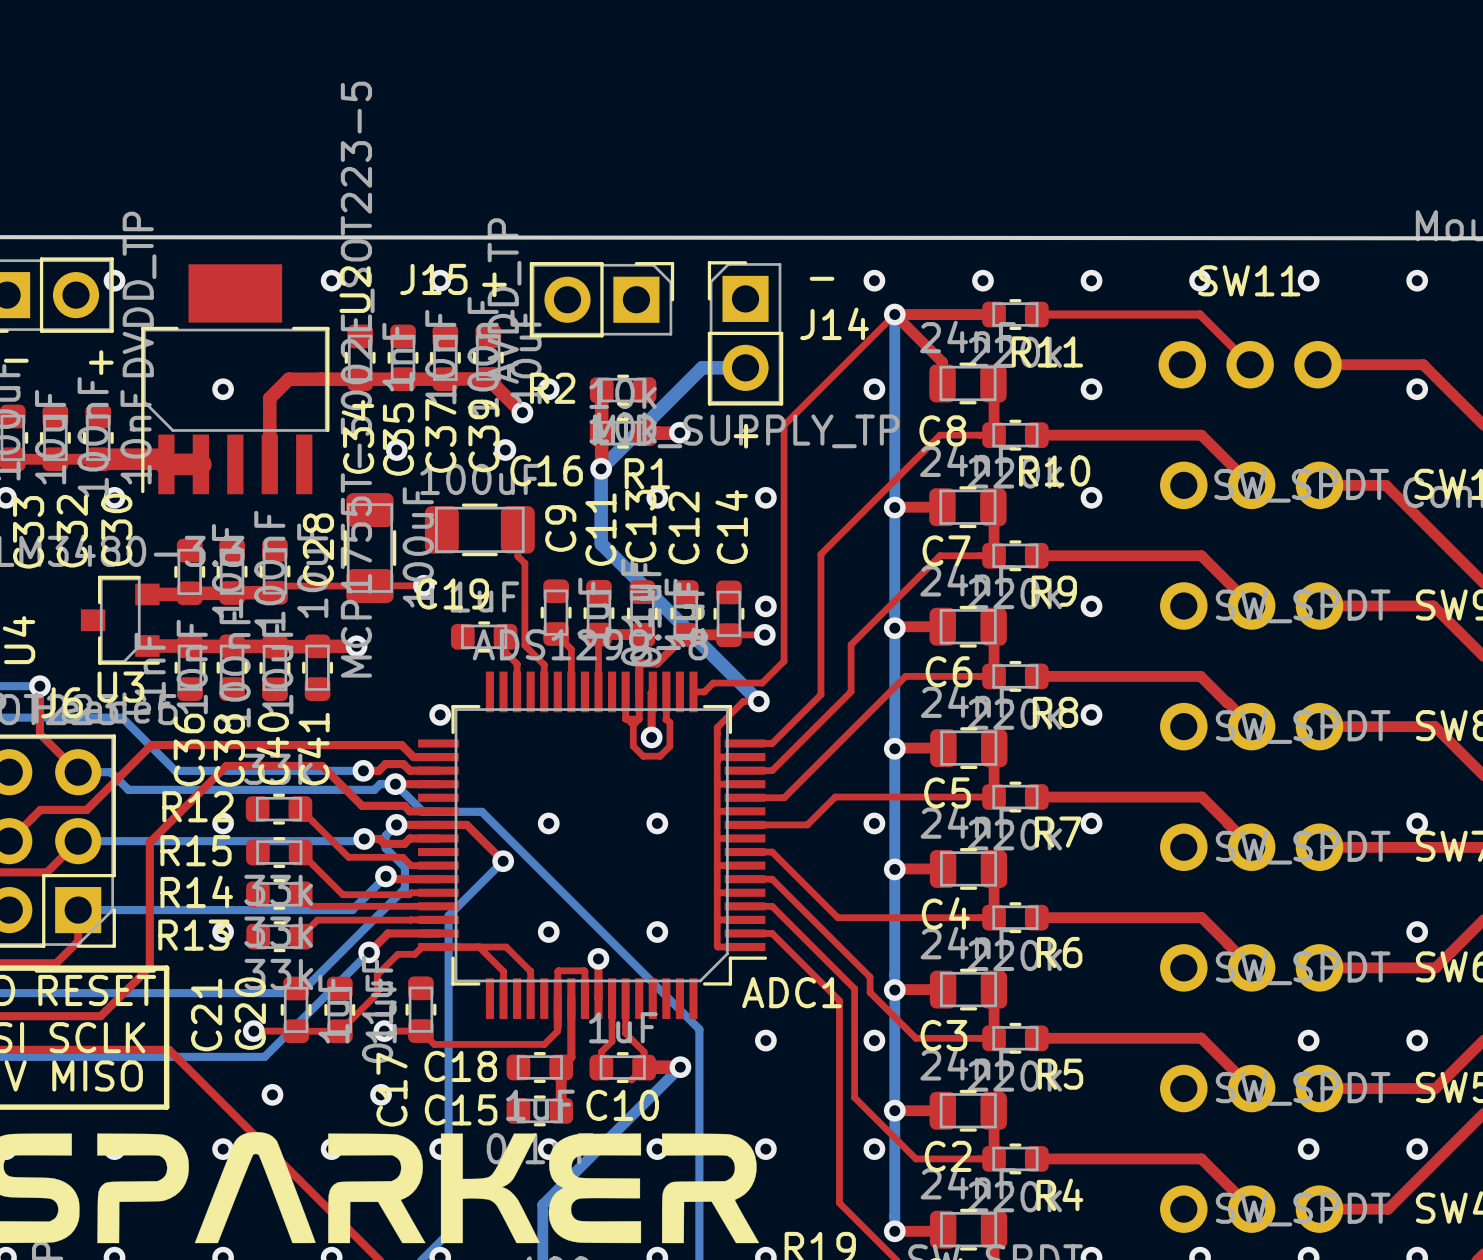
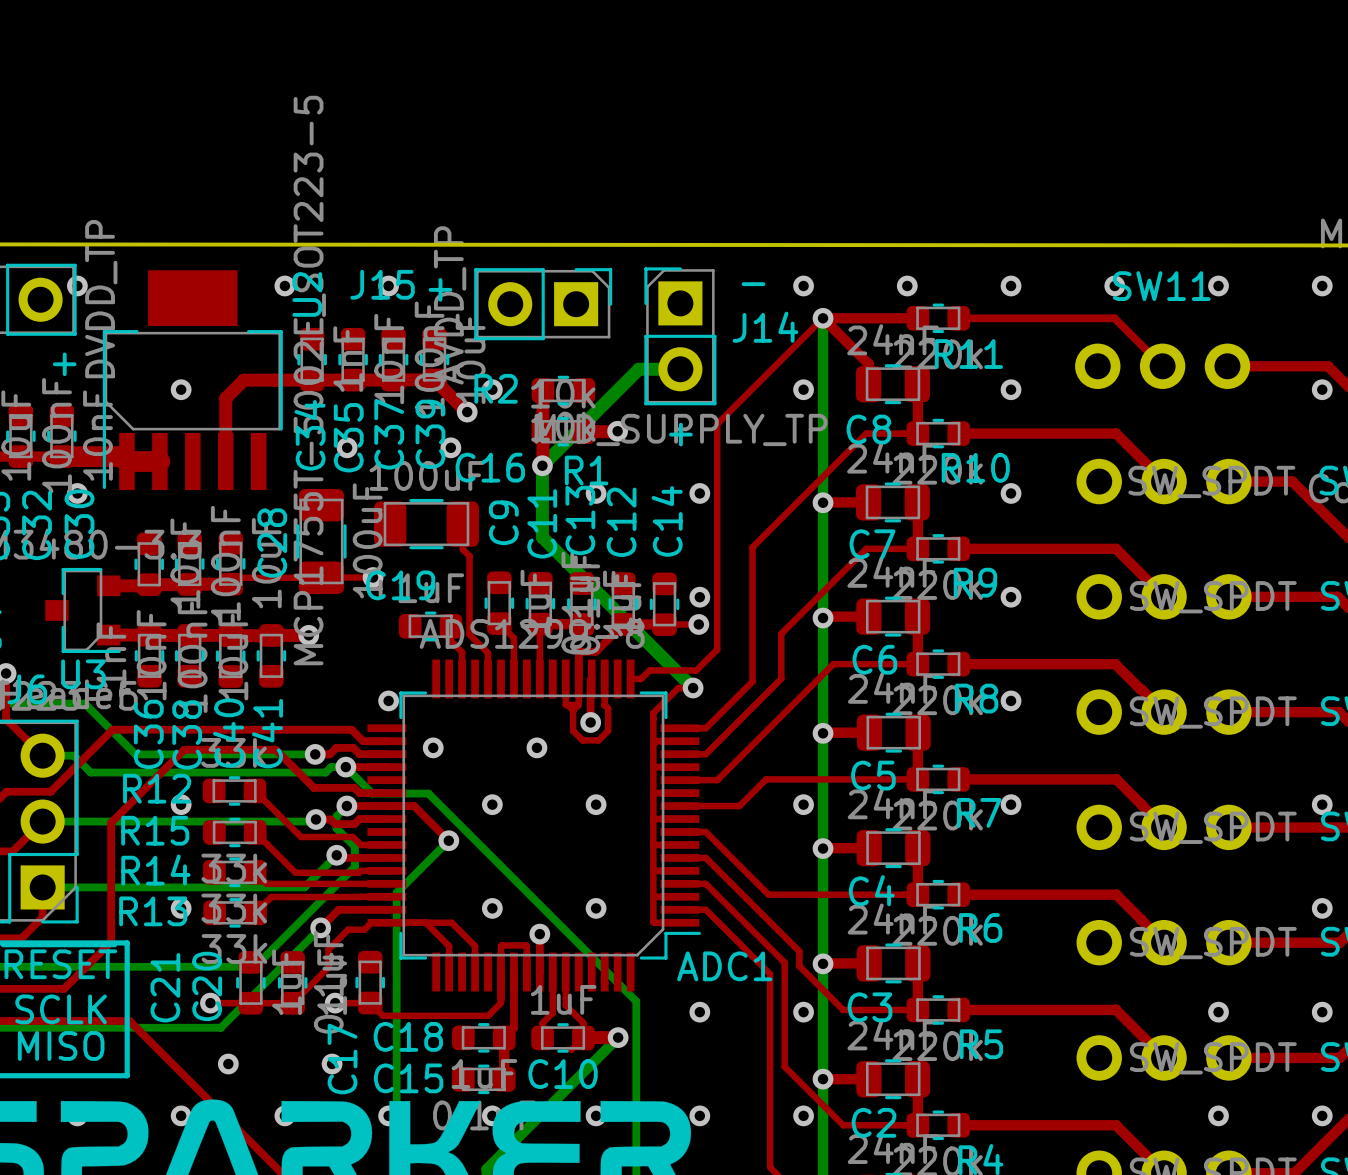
via: none -> (433, 747)
via: none -> (536, 747)

